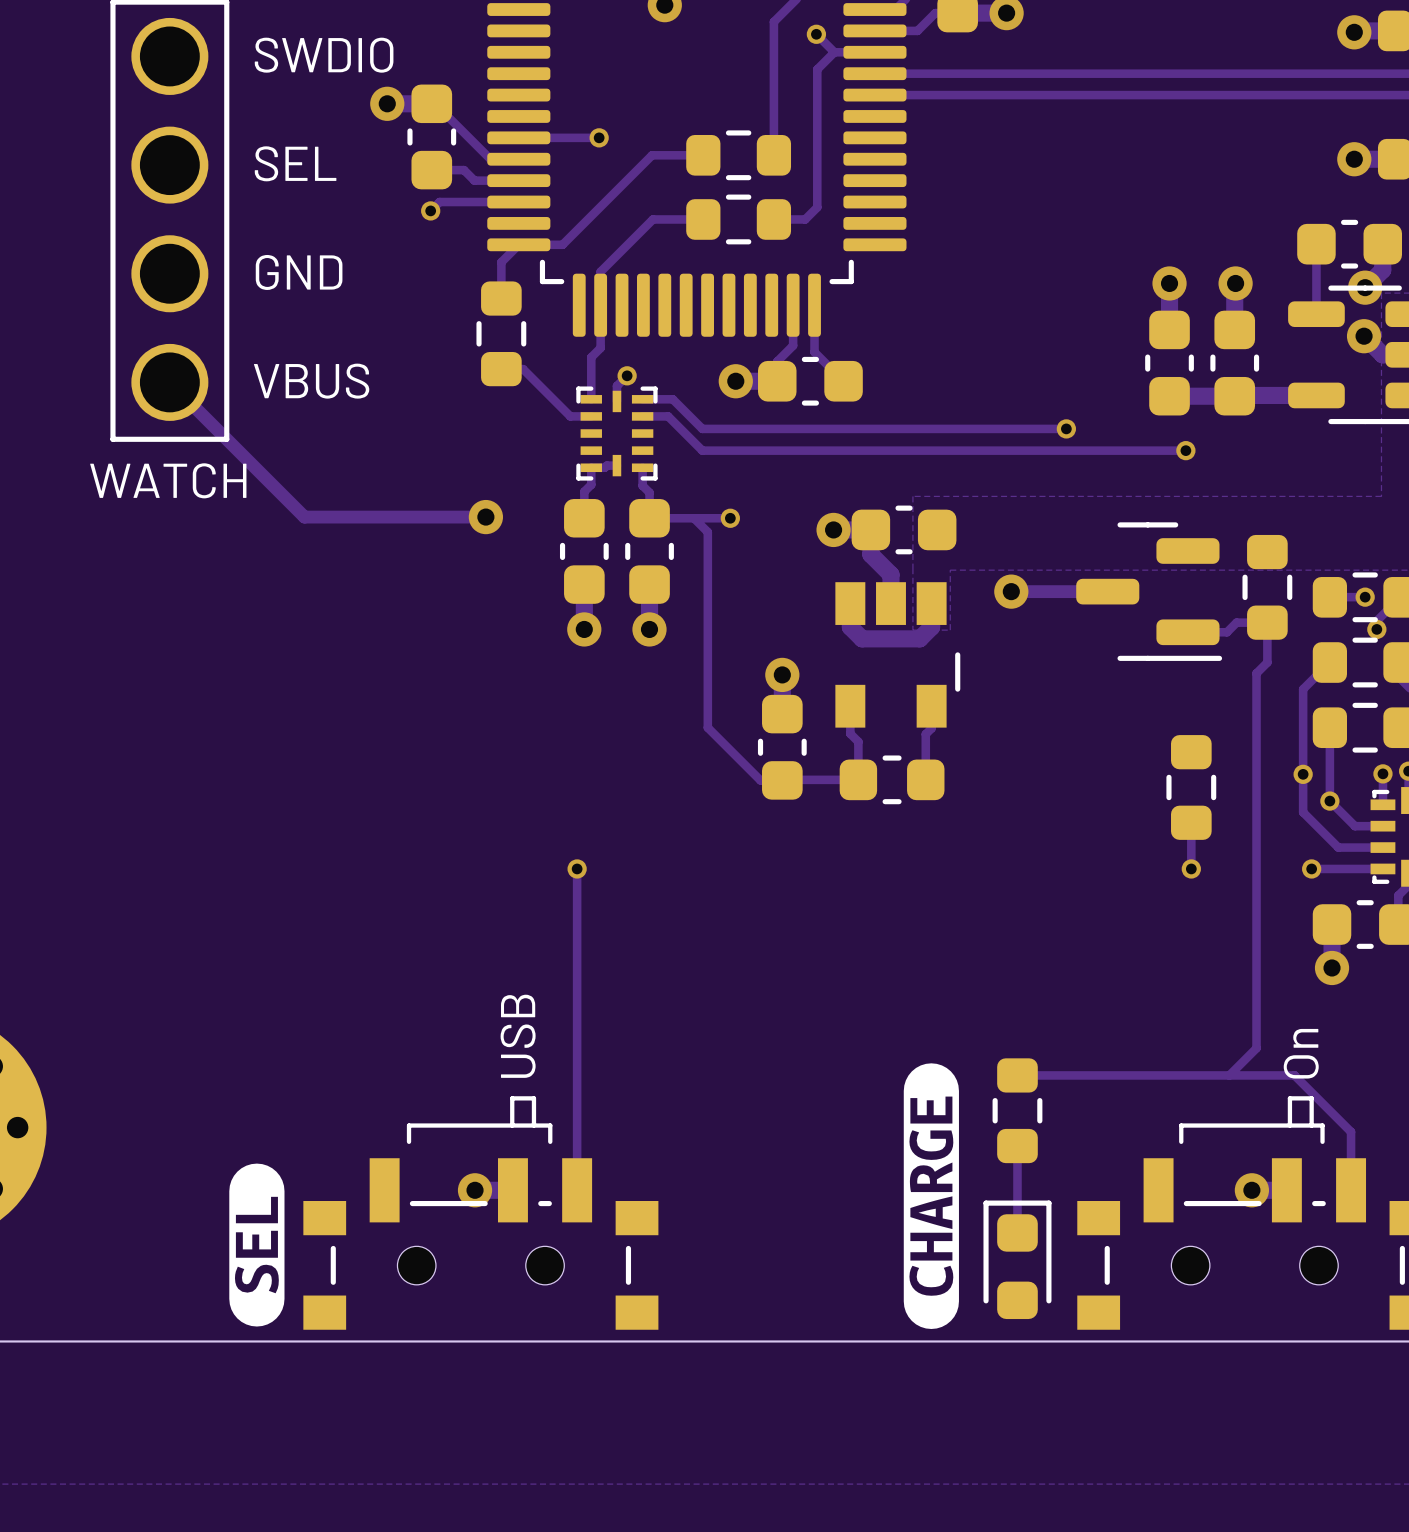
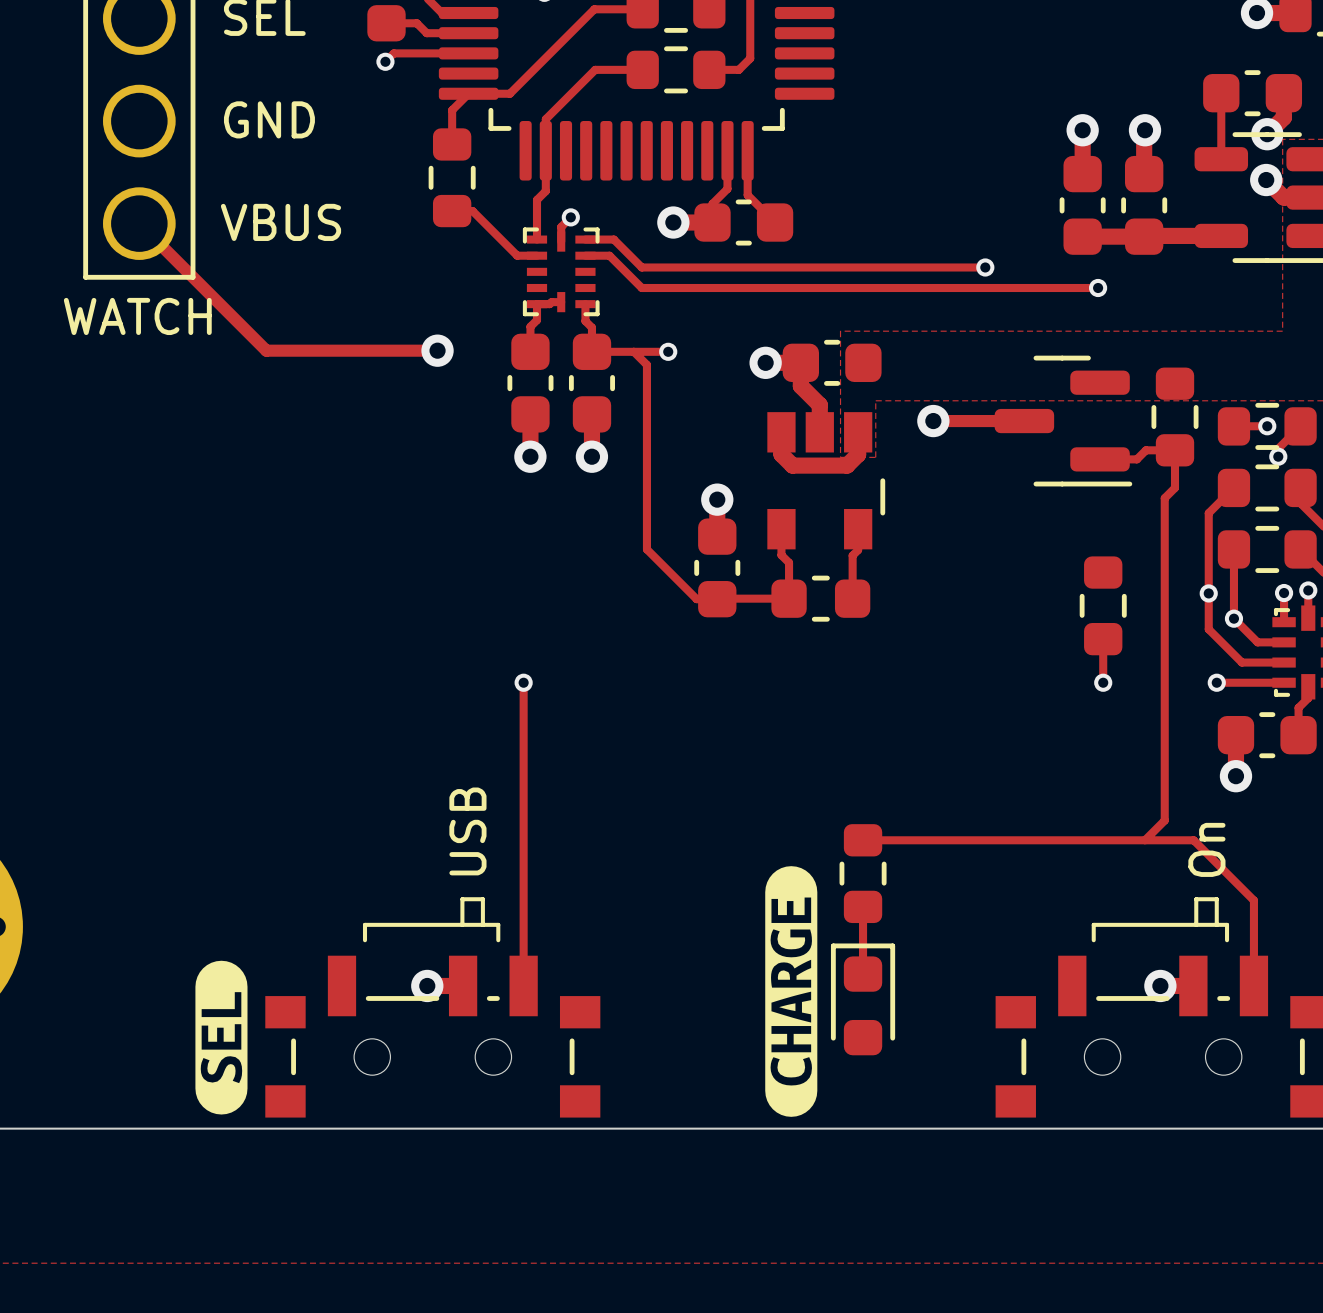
track: (1256, 1015) (1256, 1048) (1229, 1075) -> (1164, 820) (1145, 840)
track: (1017, 1075) (1294, 1075) (1351, 1131) -> (863, 840) (1193, 840) (1253, 900) (1253, 930)
track: none -> (863, 906) (863, 974)
part position: (1017, 1110) -> (863, 873)
track: (1017, 1146) (1017, 1232) -> none
drawing position: (931, 1196) -> (791, 991)
part position: (1017, 1259) -> (863, 999)

